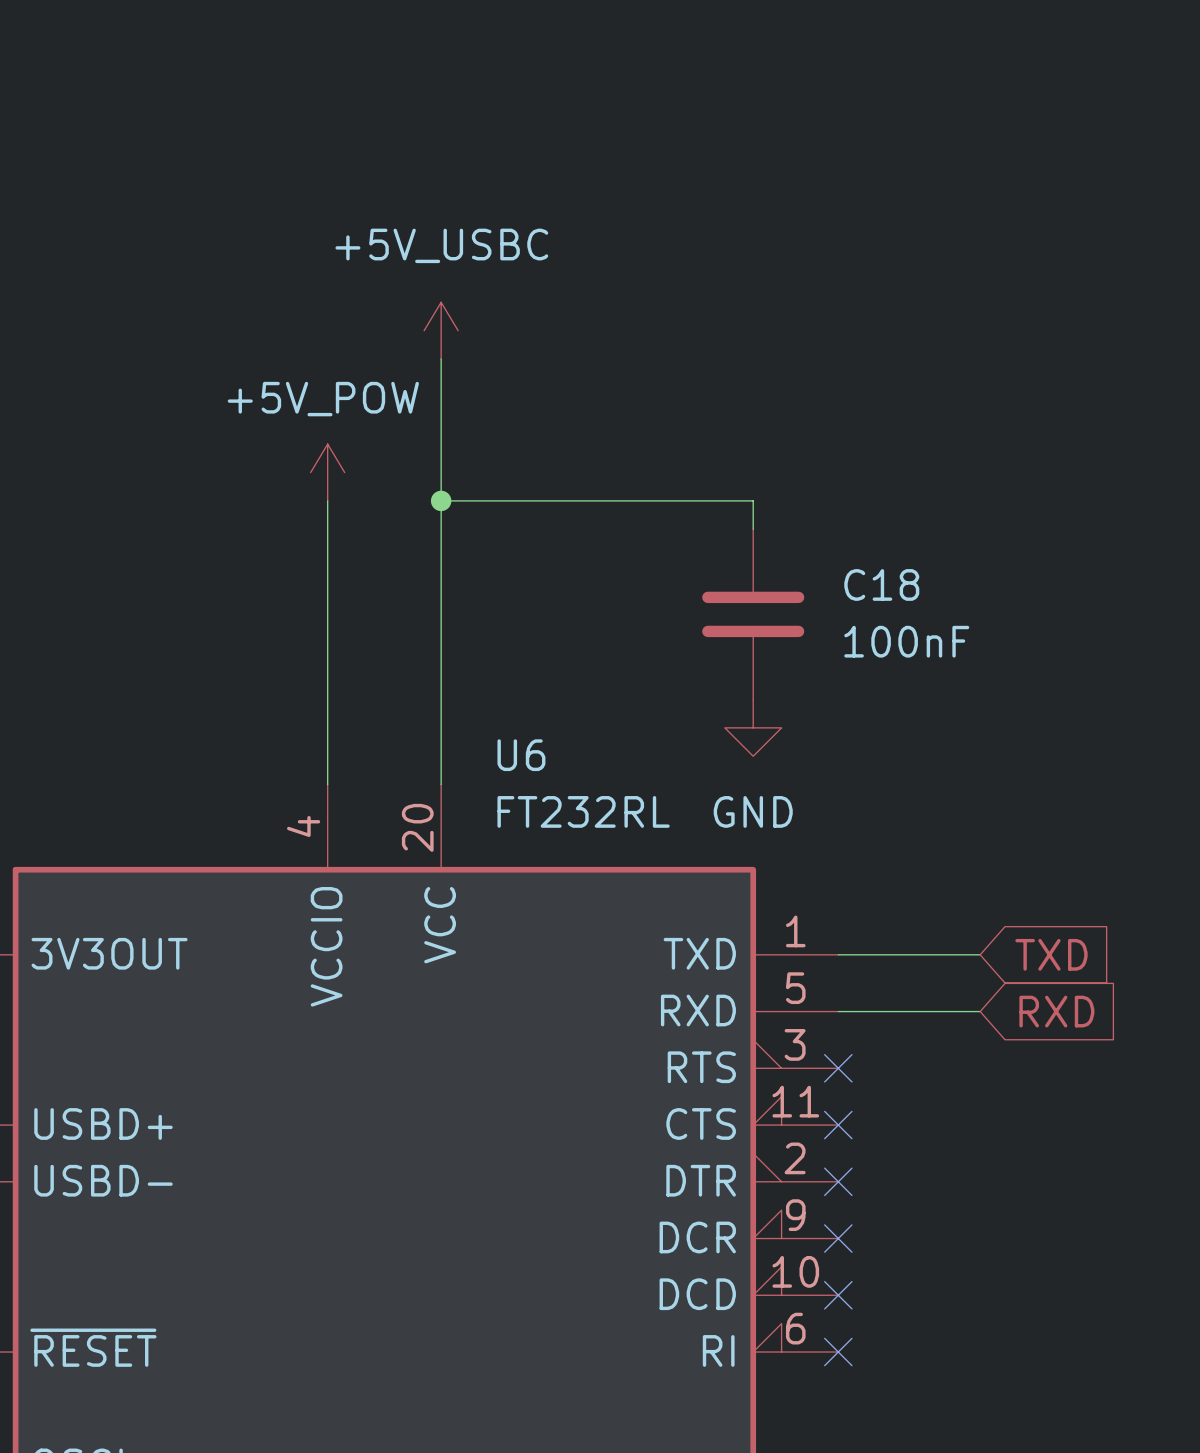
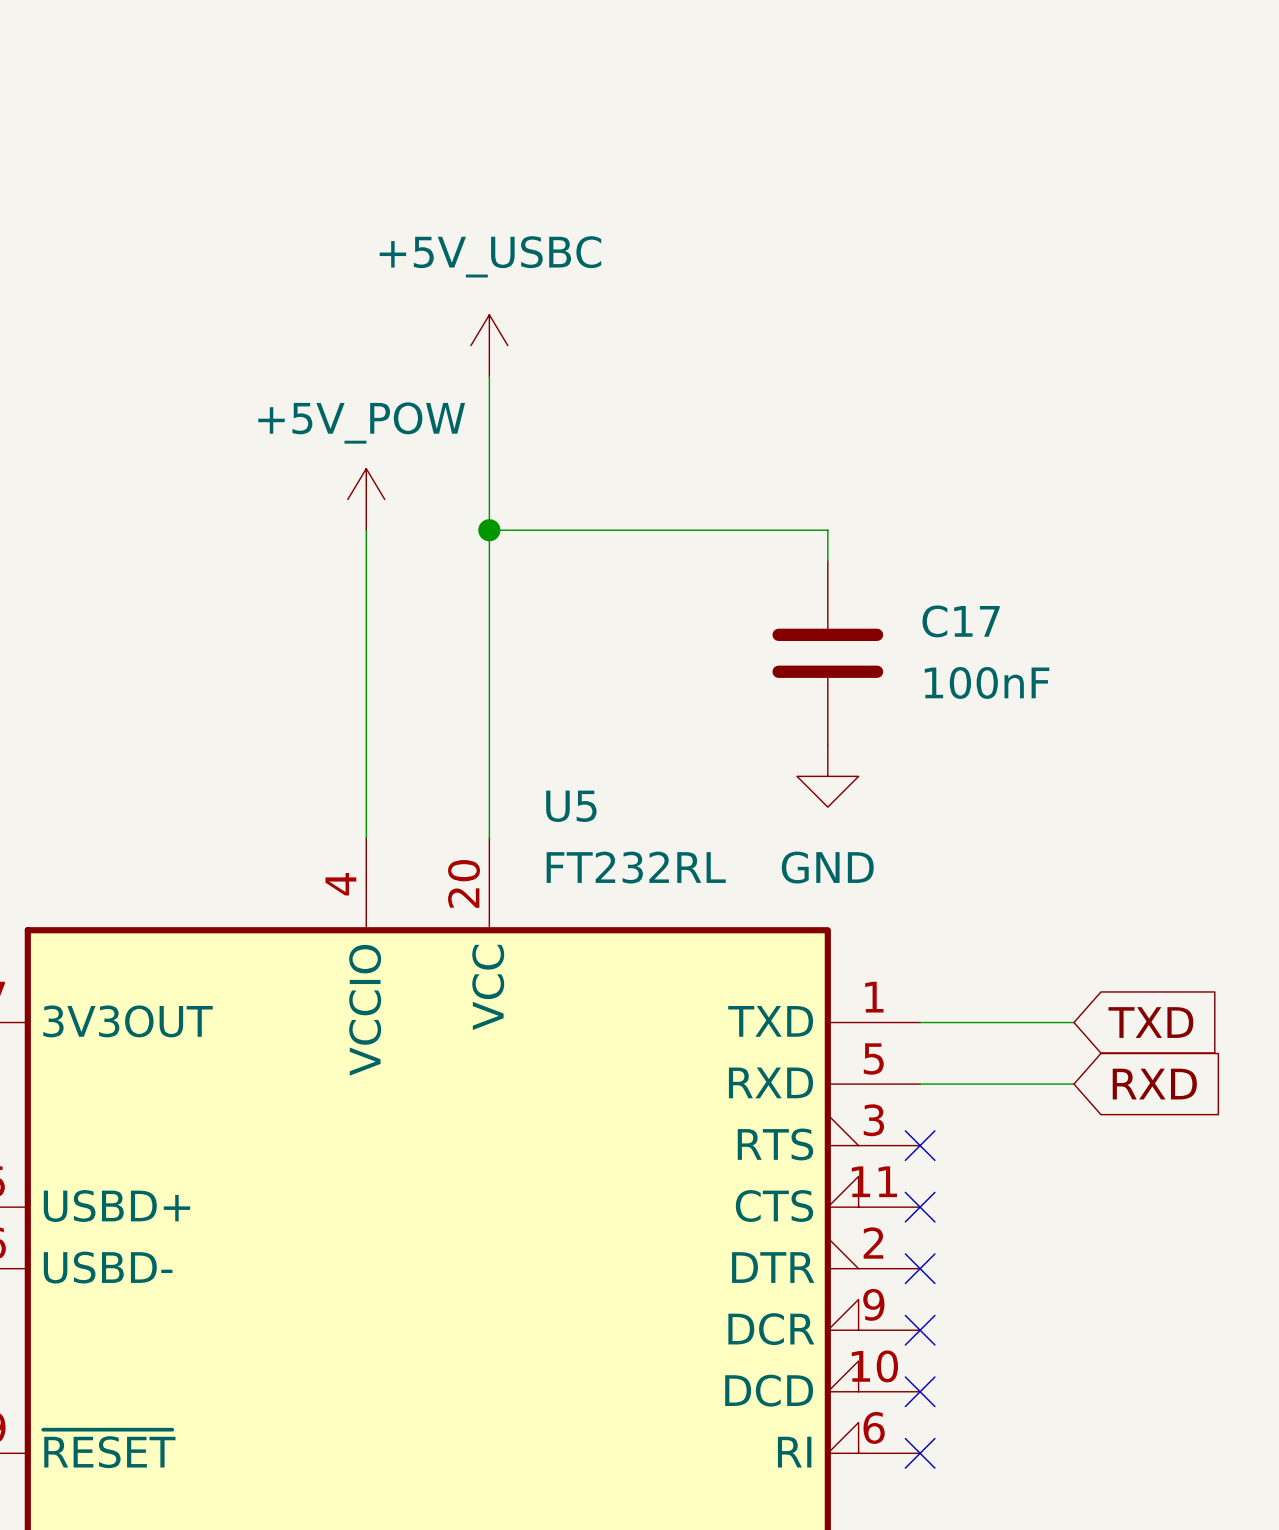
C18 name: C18 (881, 584) -> C17 (961, 621)
U6 name: U6 (521, 755) -> U5 (571, 806)

